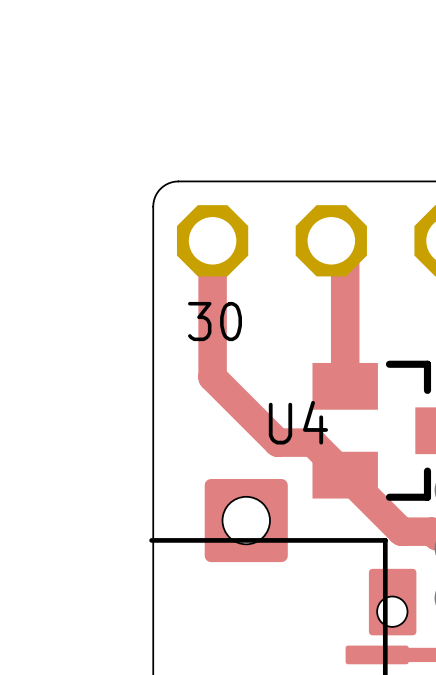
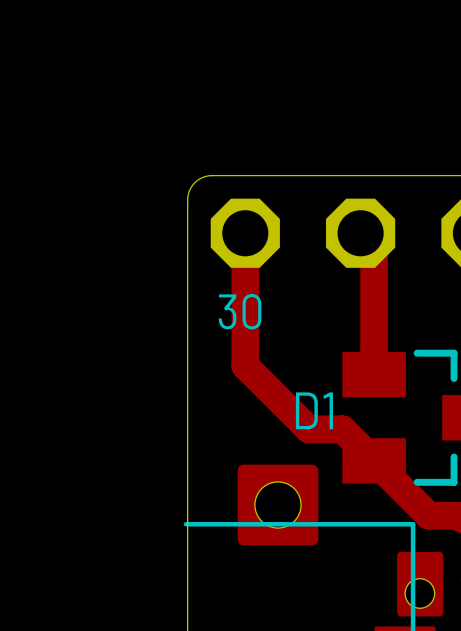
U4 name: U4 (298, 422) -> D1 (314, 410)

